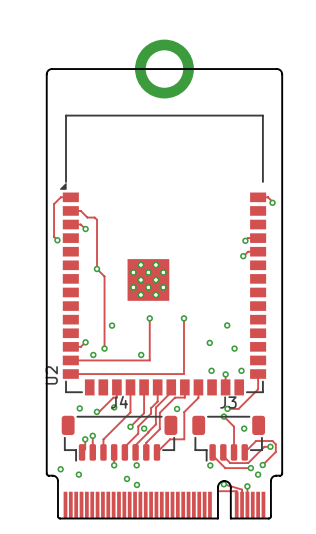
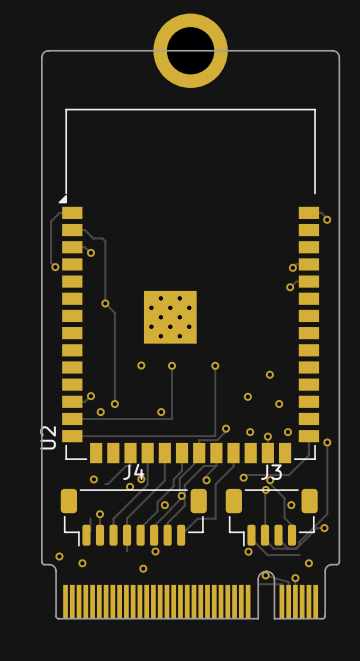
via position: (112, 325) -> (141, 365)
track: none -> (226, 428) (226, 431) (217, 440) (199, 440) (199, 453)
via: none -> (226, 428)
via: none -> (327, 442)
track: (258, 389) (238, 408) (227, 408) -> (308, 455) (289, 474) (246, 474) (243, 477)
track: none -> (216, 465) (203, 479)
via: none -> (243, 477)
via: (114, 407) -> none
via: (79, 408) -> none
via: none -> (93, 479)
via: none -> (141, 479)
track: (144, 409) (144, 413) (130, 426) -> (164, 480) (127, 518) (127, 535)
via: (96, 411) -> none
via: none -> (130, 486)
track: (223, 416) (234, 426) (234, 452) -> (327, 442) (327, 514) (299, 542) (299, 545) (295, 548) (288, 548) (278, 539) (278, 535)
track: none -> (265, 491) (264, 535)
via: none -> (181, 495)
via: (130, 426) -> none
via: (85, 439) -> none
track: (244, 452) (256, 441) (272, 441) (275, 444) (275, 451) (262, 465) -> (292, 535) (292, 525) (284, 517) (284, 498) (268, 482)
via: (114, 465) -> none
via: (262, 465) -> none
via: (250, 468) -> none
via: (136, 484) -> none

